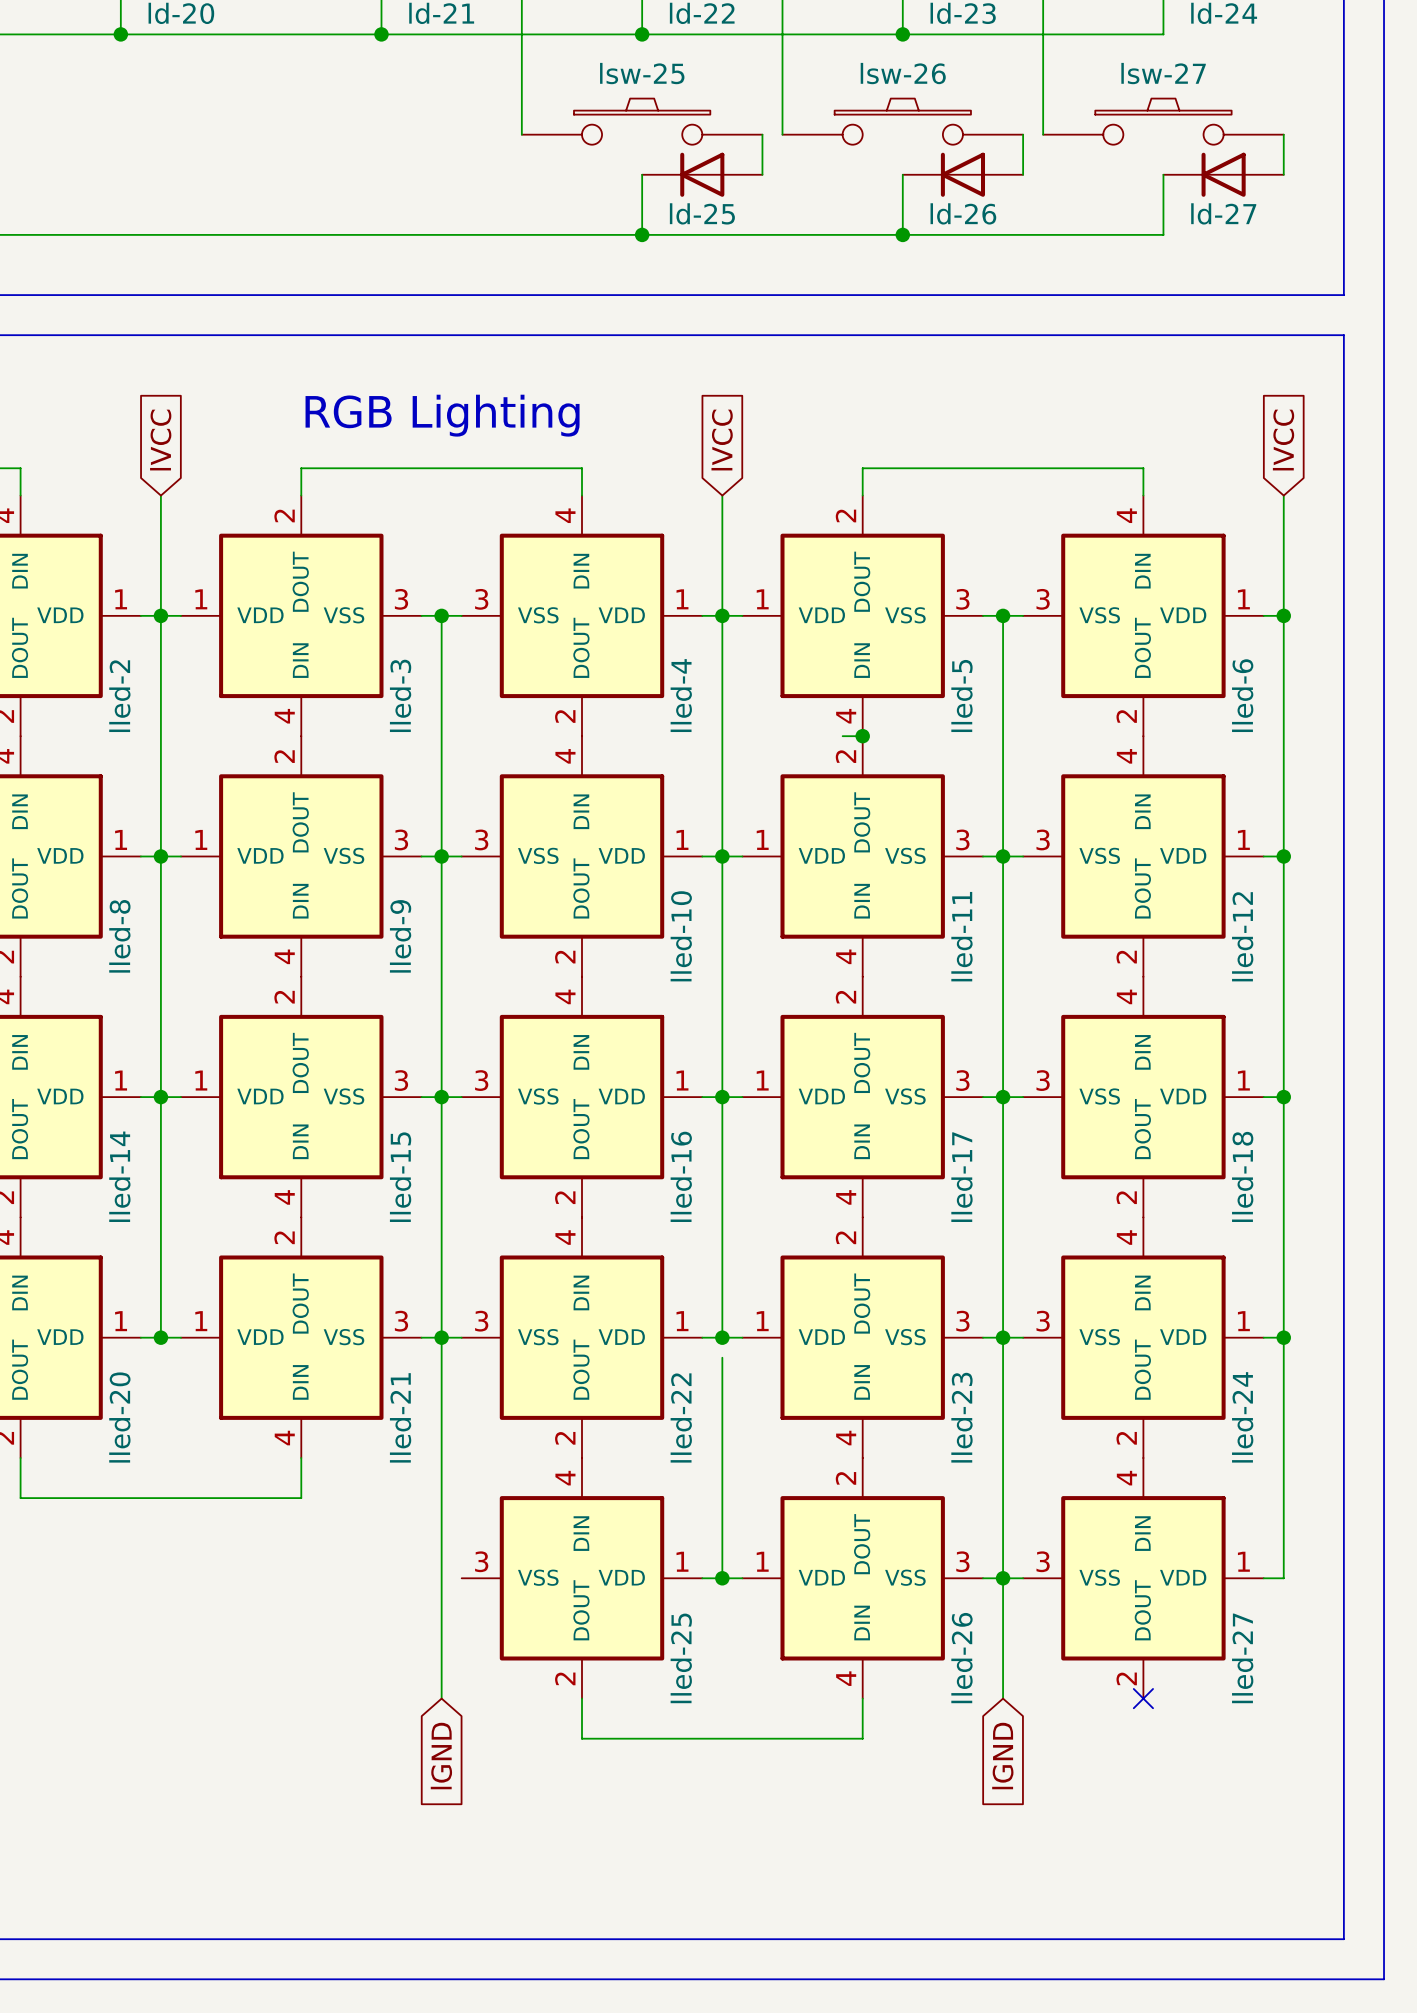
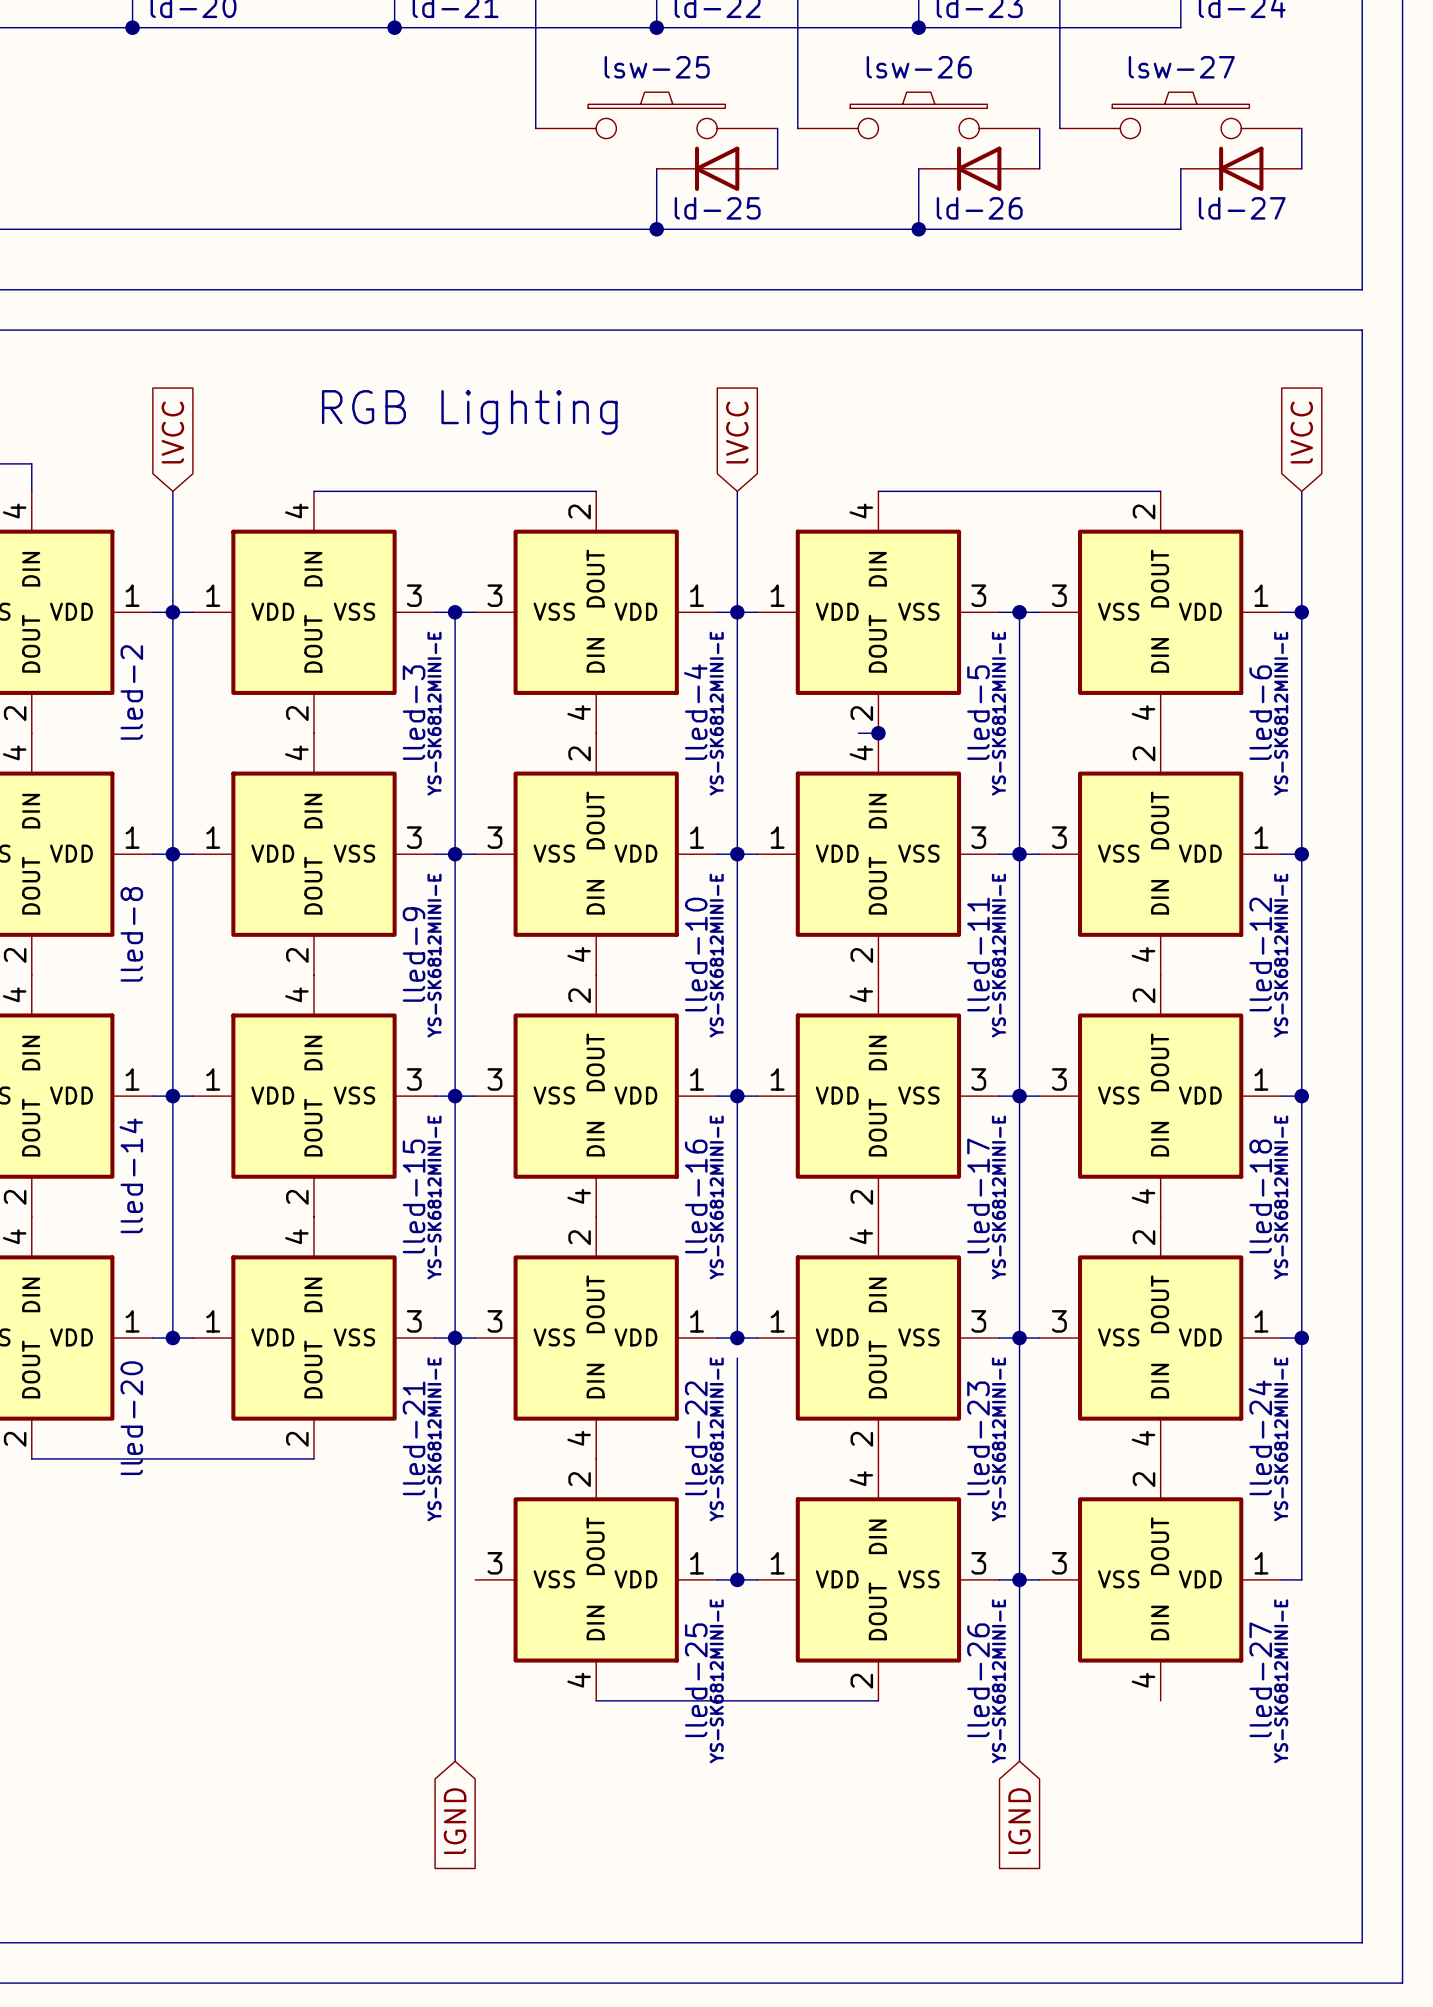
wire: (301, 495) (301, 468) (581, 468) (581, 495) -> (313, 491) (596, 491)
wire: (862, 495) (862, 468) (1143, 468) (1143, 495) -> (878, 491) (1160, 491)
lled-3 flip: as is (301, 615) -> up-down (313, 612)
lled-4 flip: as is (581, 615) -> up-down (596, 612)
lled-5 flip: as is (862, 615) -> up-down (878, 612)
lled-6 flip: as is (1143, 615) -> up-down (1160, 612)
lled-3 value: none -> YS-SK6812MINI-E (434, 713)
lled-4 value: none -> YS-SK6812MINI-E (716, 713)
lled-5 value: none -> YS-SK6812MINI-E (998, 713)
lled-6 value: none -> YS-SK6812MINI-E (1281, 713)
lled-9 flip: as is (301, 856) -> up-down (313, 854)
lled-10 flip: as is (581, 856) -> up-down (596, 854)
lled-11 flip: as is (862, 856) -> up-down (878, 854)
lled-12 flip: as is (1143, 856) -> up-down (1160, 854)
lled-9 value: none -> YS-SK6812MINI-E (434, 955)
lled-10 value: none -> YS-SK6812MINI-E (716, 955)
lled-11 value: none -> YS-SK6812MINI-E (998, 955)
lled-12 value: none -> YS-SK6812MINI-E (1281, 955)
lled-15 flip: as is (301, 1097) -> up-down (313, 1096)
lled-16 flip: as is (581, 1097) -> up-down (596, 1096)
lled-17 flip: as is (862, 1097) -> up-down (878, 1096)
lled-18 flip: as is (1143, 1097) -> up-down (1160, 1096)
lled-15 value: none -> YS-SK6812MINI-E (434, 1197)
lled-16 value: none -> YS-SK6812MINI-E (716, 1197)
lled-17 value: none -> YS-SK6812MINI-E (998, 1197)
lled-18 value: none -> YS-SK6812MINI-E (1281, 1197)
lled-21 flip: as is (301, 1337) -> up-down (313, 1338)
lled-22 flip: as is (581, 1337) -> up-down (596, 1338)
lled-23 flip: as is (862, 1337) -> up-down (878, 1338)
lled-24 flip: as is (1143, 1337) -> up-down (1160, 1338)
lled-21 value: none -> YS-SK6812MINI-E (434, 1439)
lled-22 value: none -> YS-SK6812MINI-E (716, 1439)
lled-23 value: none -> YS-SK6812MINI-E (998, 1439)
lled-24 value: none -> YS-SK6812MINI-E (1281, 1439)
wire: (20, 1457) (20, 1498) (301, 1498) (301, 1457) -> (31, 1458) (313, 1458)
lled-25 flip: as is (581, 1578) -> up-down (596, 1579)
lled-26 flip: as is (862, 1578) -> up-down (878, 1579)
lled-27 flip: as is (1143, 1578) -> up-down (1160, 1579)
lled-25 value: none -> YS-SK6812MINI-E (716, 1681)
lled-26 value: none -> YS-SK6812MINI-E (998, 1681)
lled-27 value: none -> YS-SK6812MINI-E (1281, 1681)
wire: none -> (455, 1700) (455, 1761)
wire: (581, 1698) (581, 1738) (862, 1738) (862, 1698) -> (596, 1700) (878, 1700)
wire: none -> (1019, 1700) (1019, 1761)
no-connect mark: (1143, 1698) -> none
global label position: lGND (441, 1756) -> lGND (455, 1821)
global label position: lGND (1002, 1756) -> lGND (1019, 1821)

